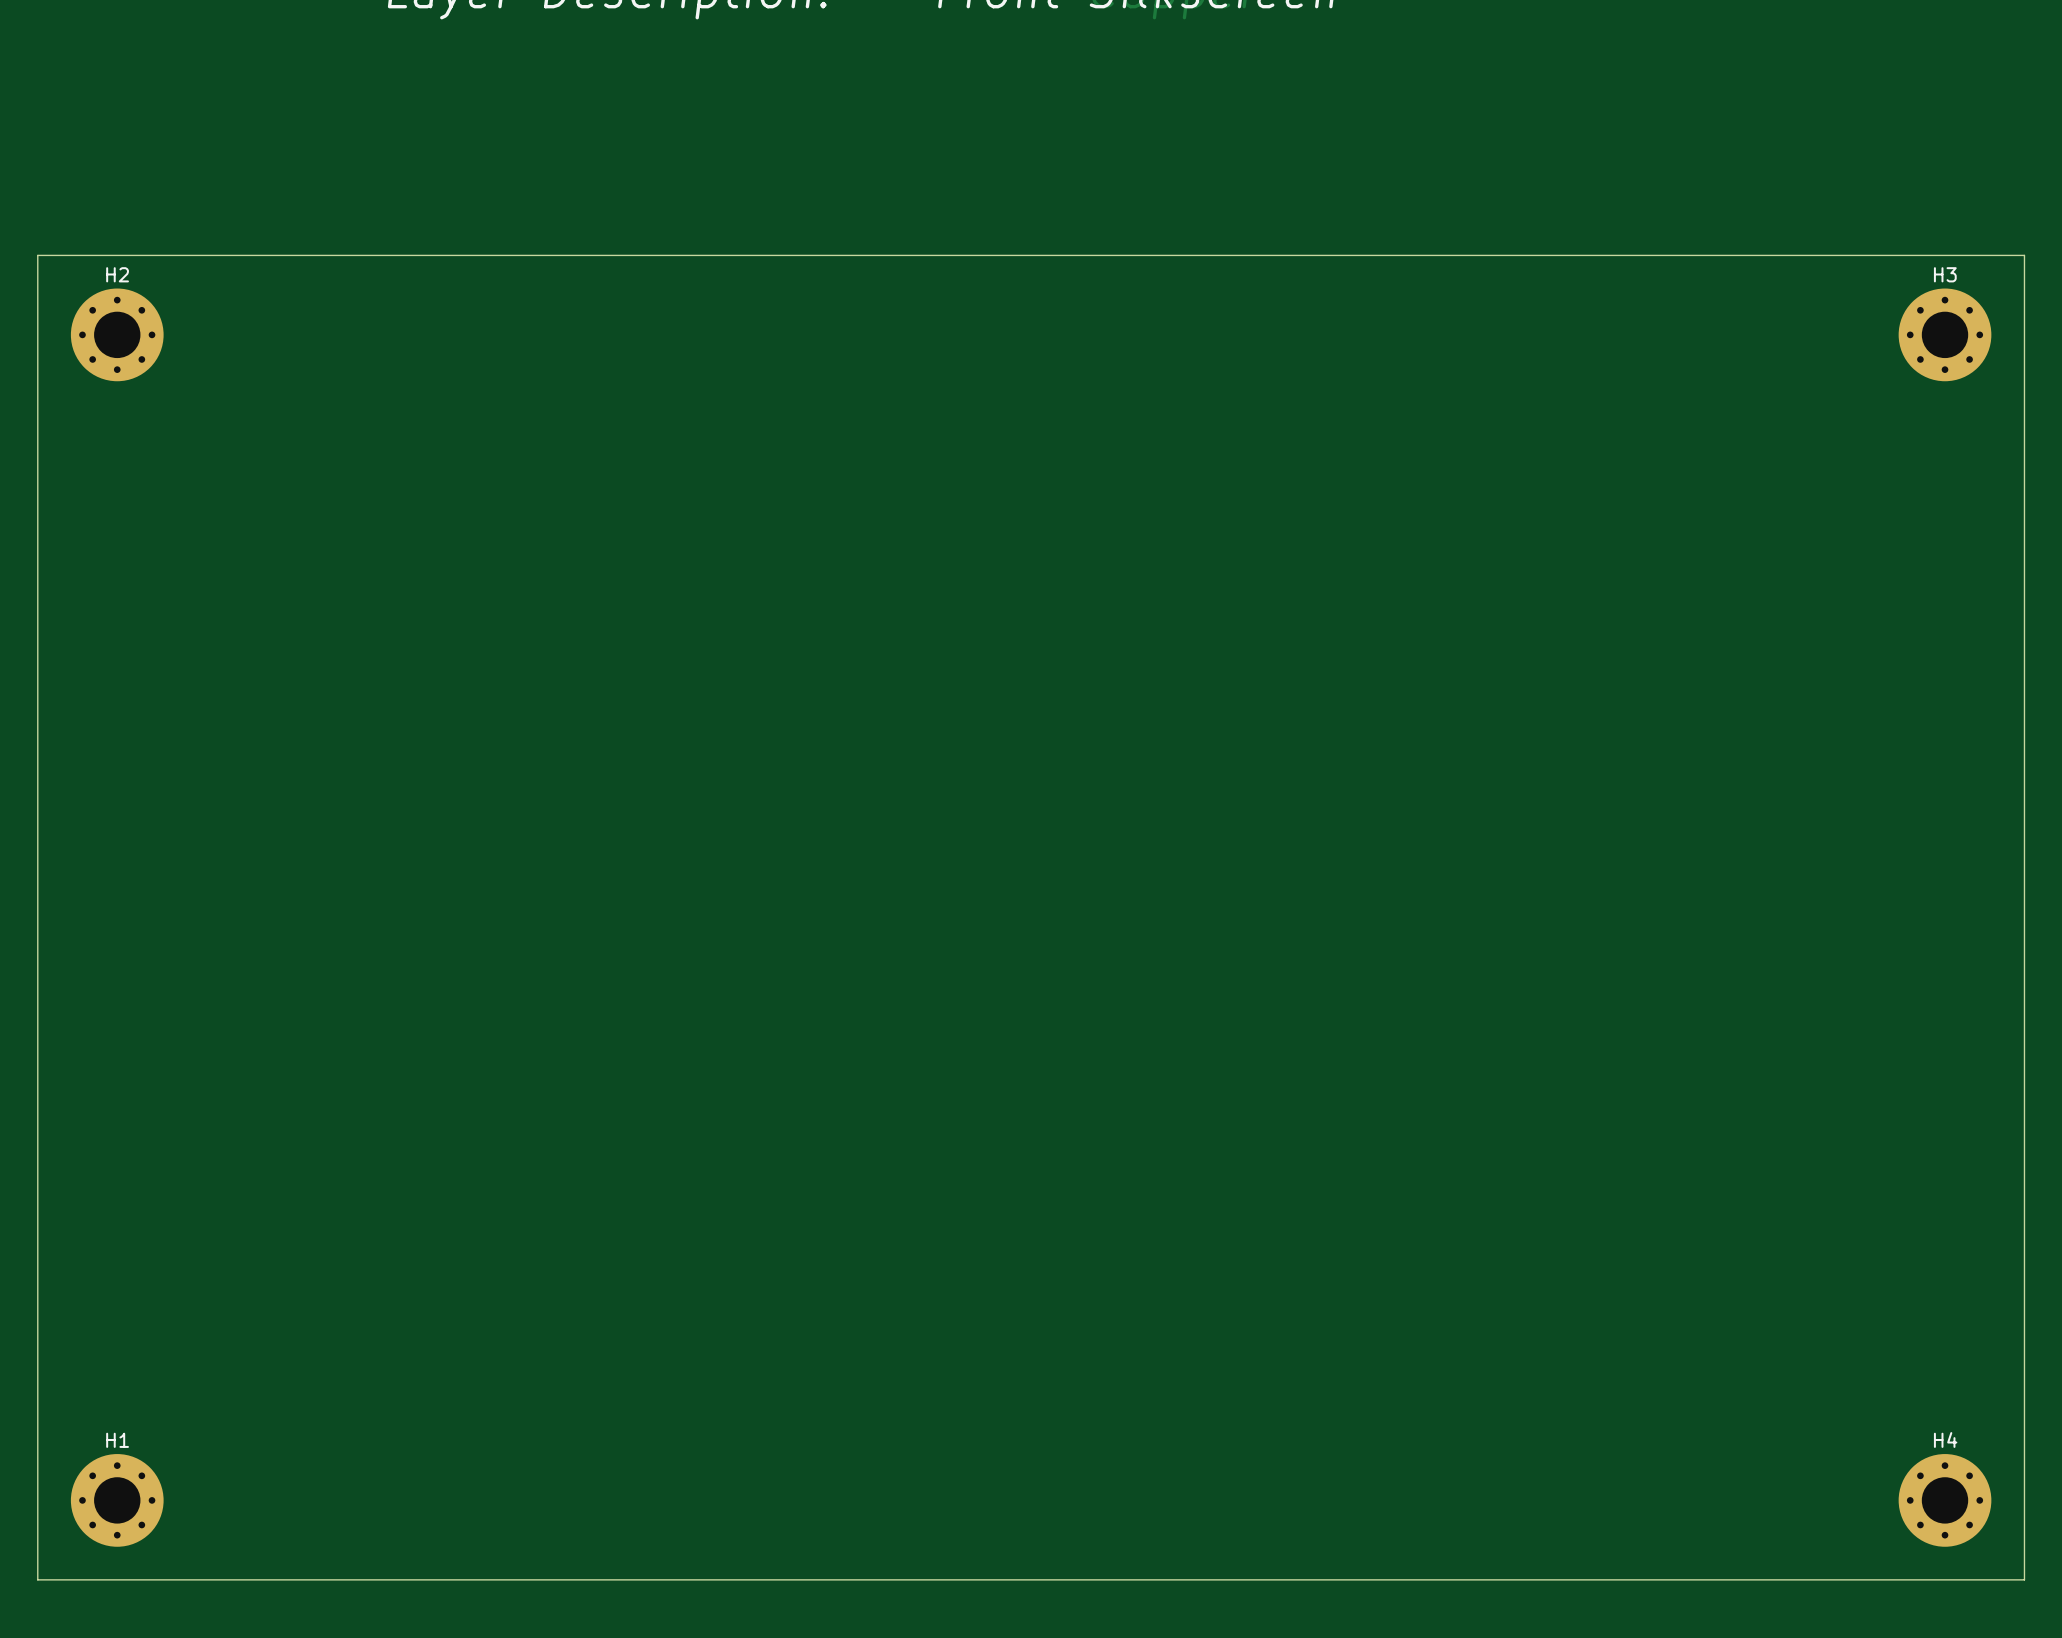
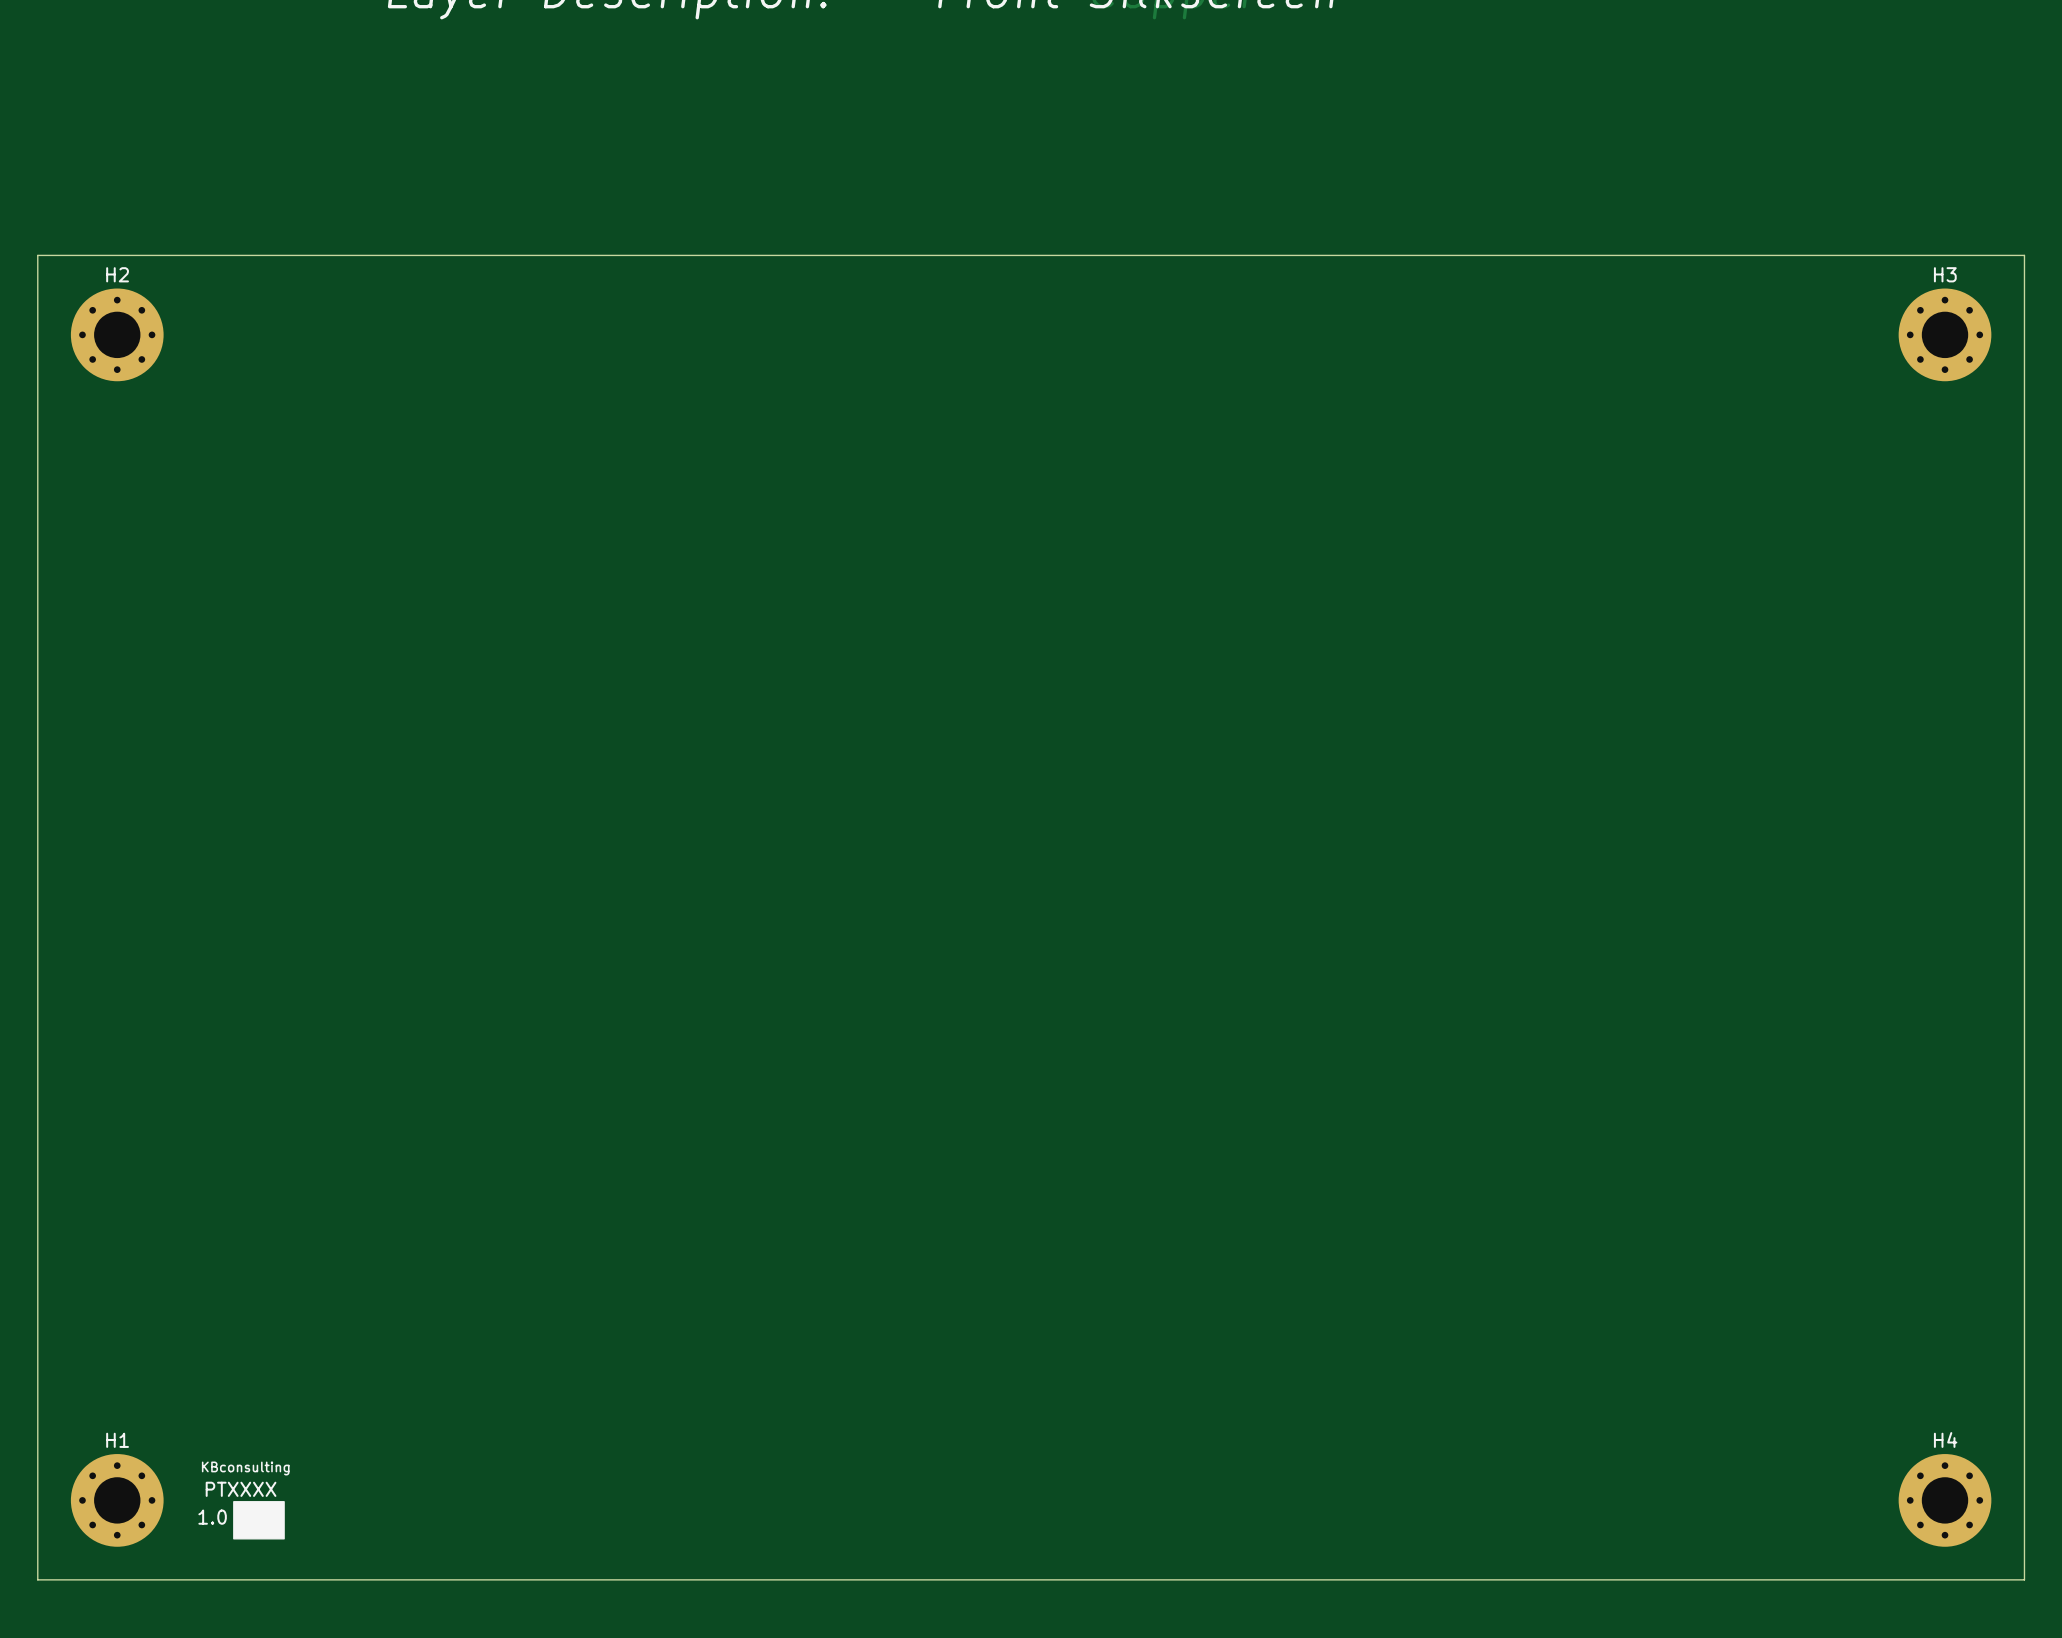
text: none -> KBconsulting (245, 1468)
text: none -> PTXXXX (241, 1489)
drawing: none -> [233, 1501, 285, 1540]
text: none -> 1.0 (212, 1517)

